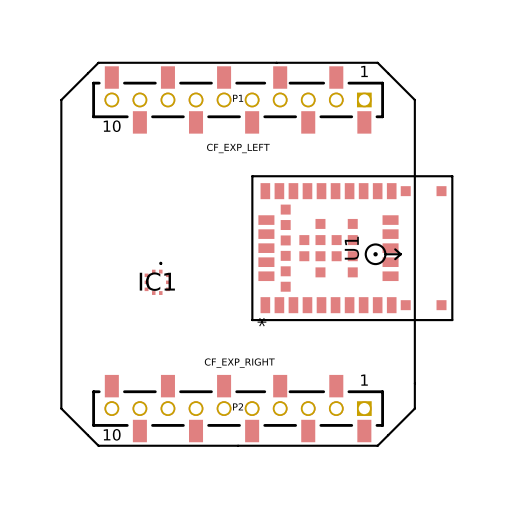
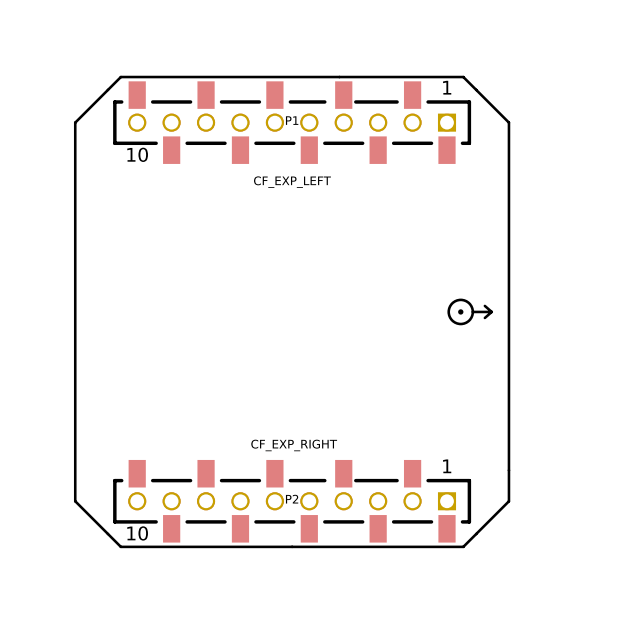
U1: (352, 248) -> none
IC1: (157, 278) -> none

